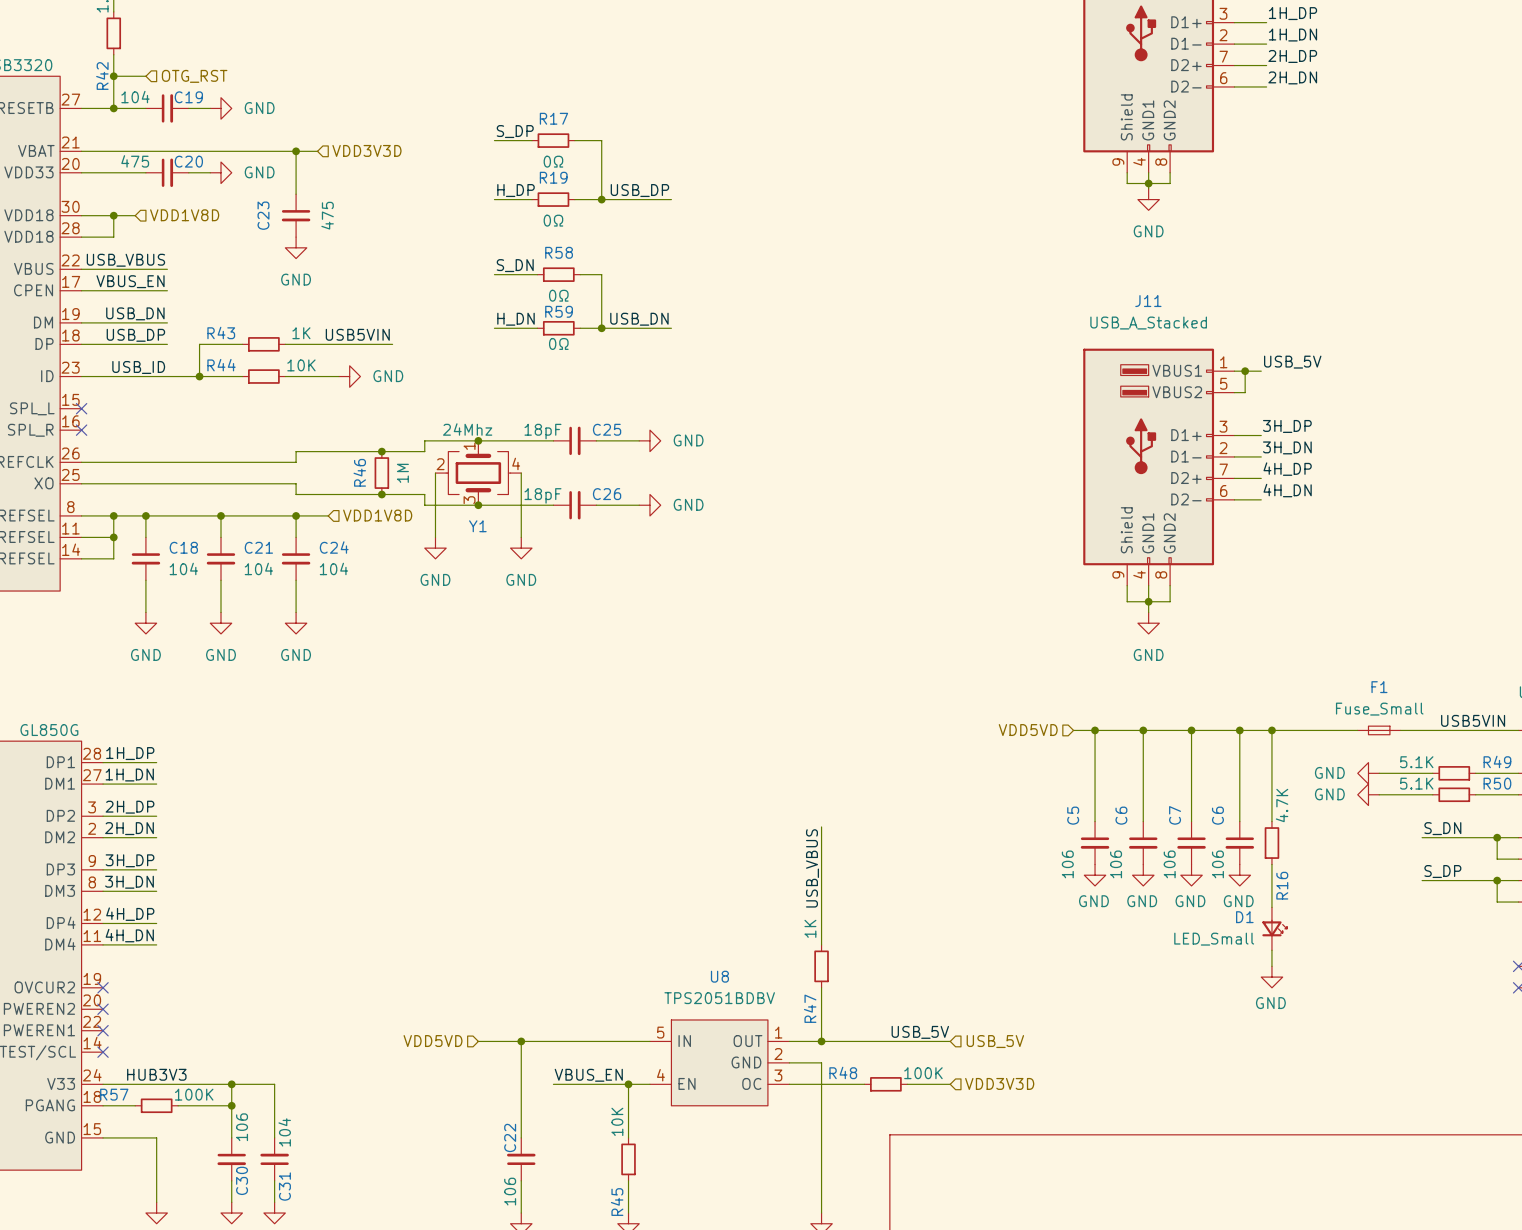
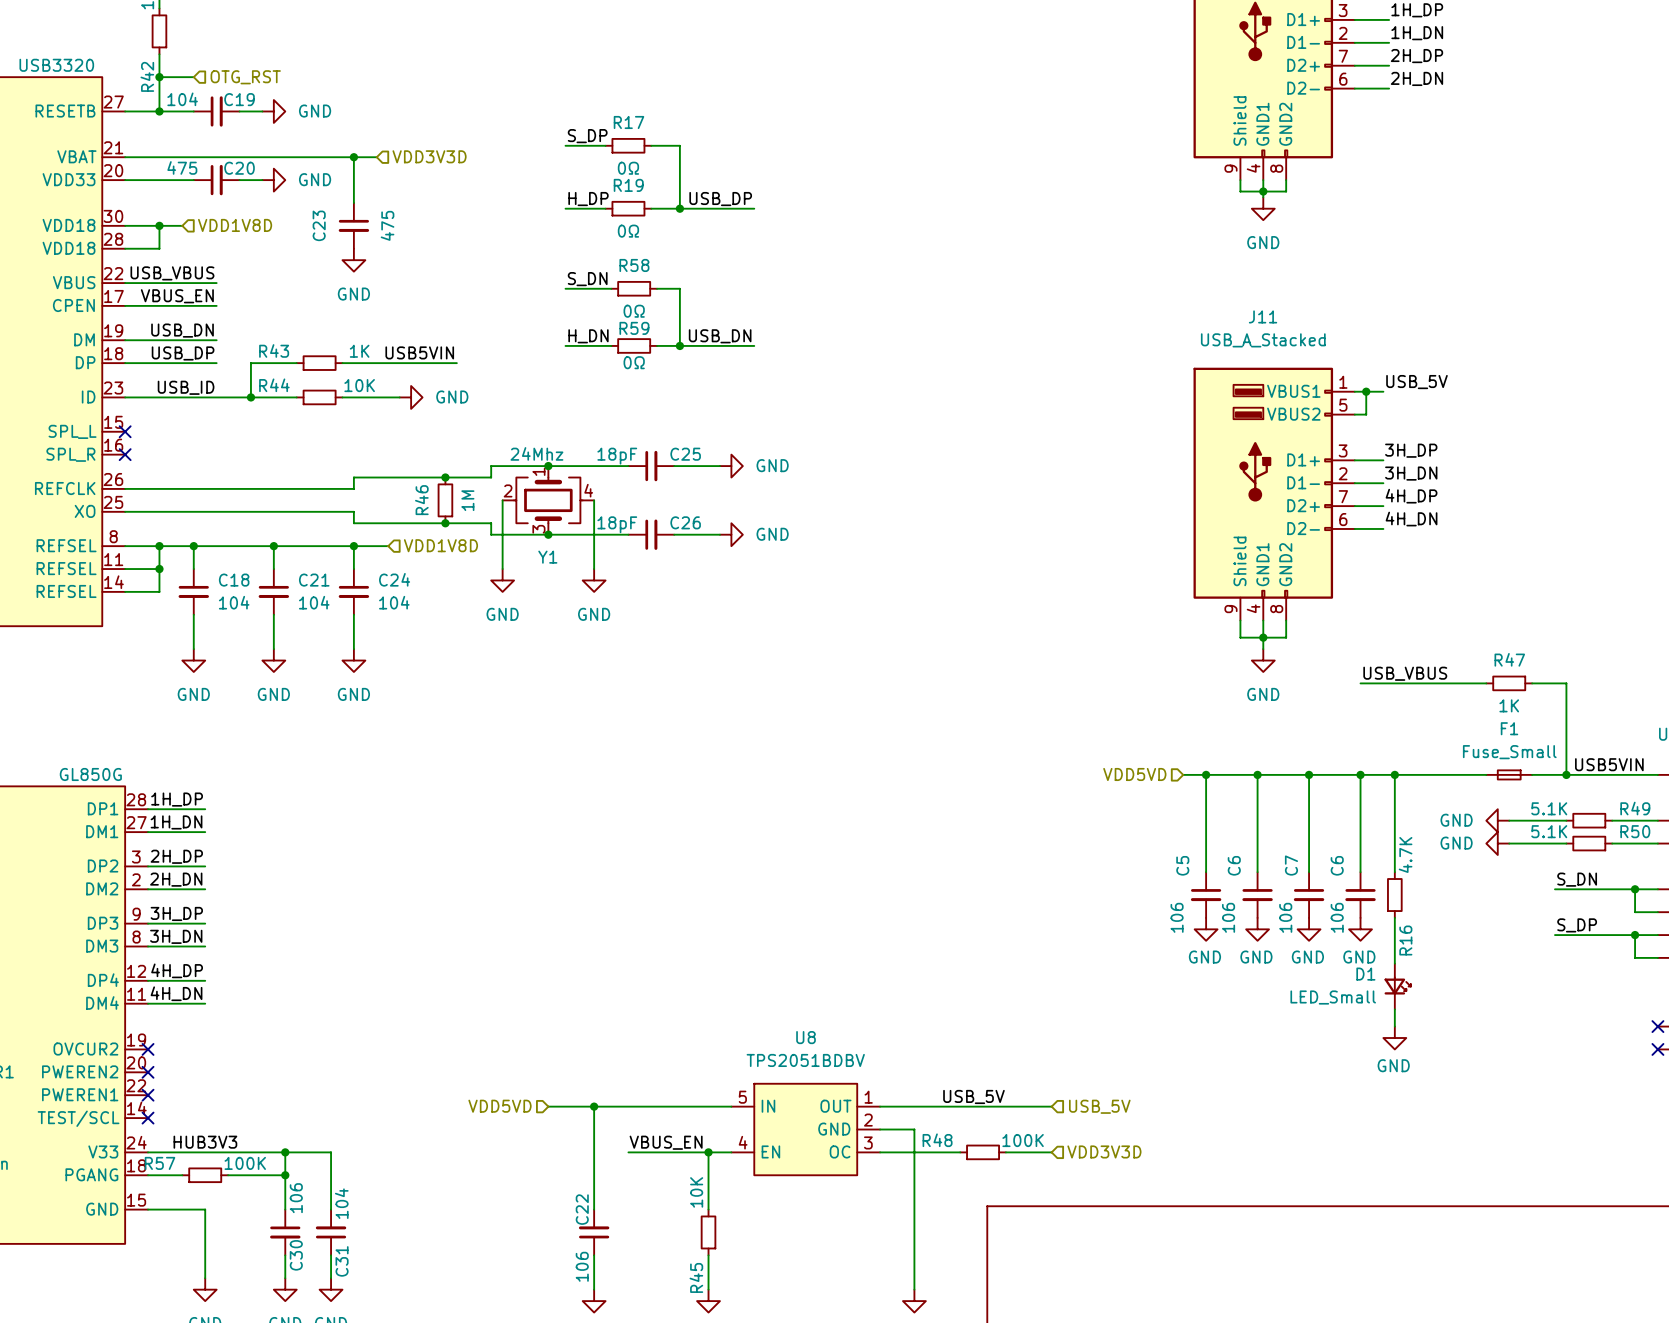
label: none -> USB_VBUS (1405, 673)
wire: none -> (1360, 683) (1486, 683)
wire: none -> (1532, 683) (1566, 683) (1566, 774)
junction: none -> (1566, 774)
wire: (821, 826) (821, 944) -> none
label: USB_VBUS (812, 868) -> none
R47 value position: 1K (810, 928) -> 1K (1509, 705)
R47 rotation: 0° (821, 966) -> 90° clockwise (1509, 683)
R47 position: (821, 966) -> (1509, 683)
wire: (821, 987) (821, 1041) -> none
R47 name position: R47 (810, 1008) -> R47 (1509, 659)
label position: USB_5V (920, 1032) -> USB_5V (973, 1096)
junction: (821, 1041) -> none

